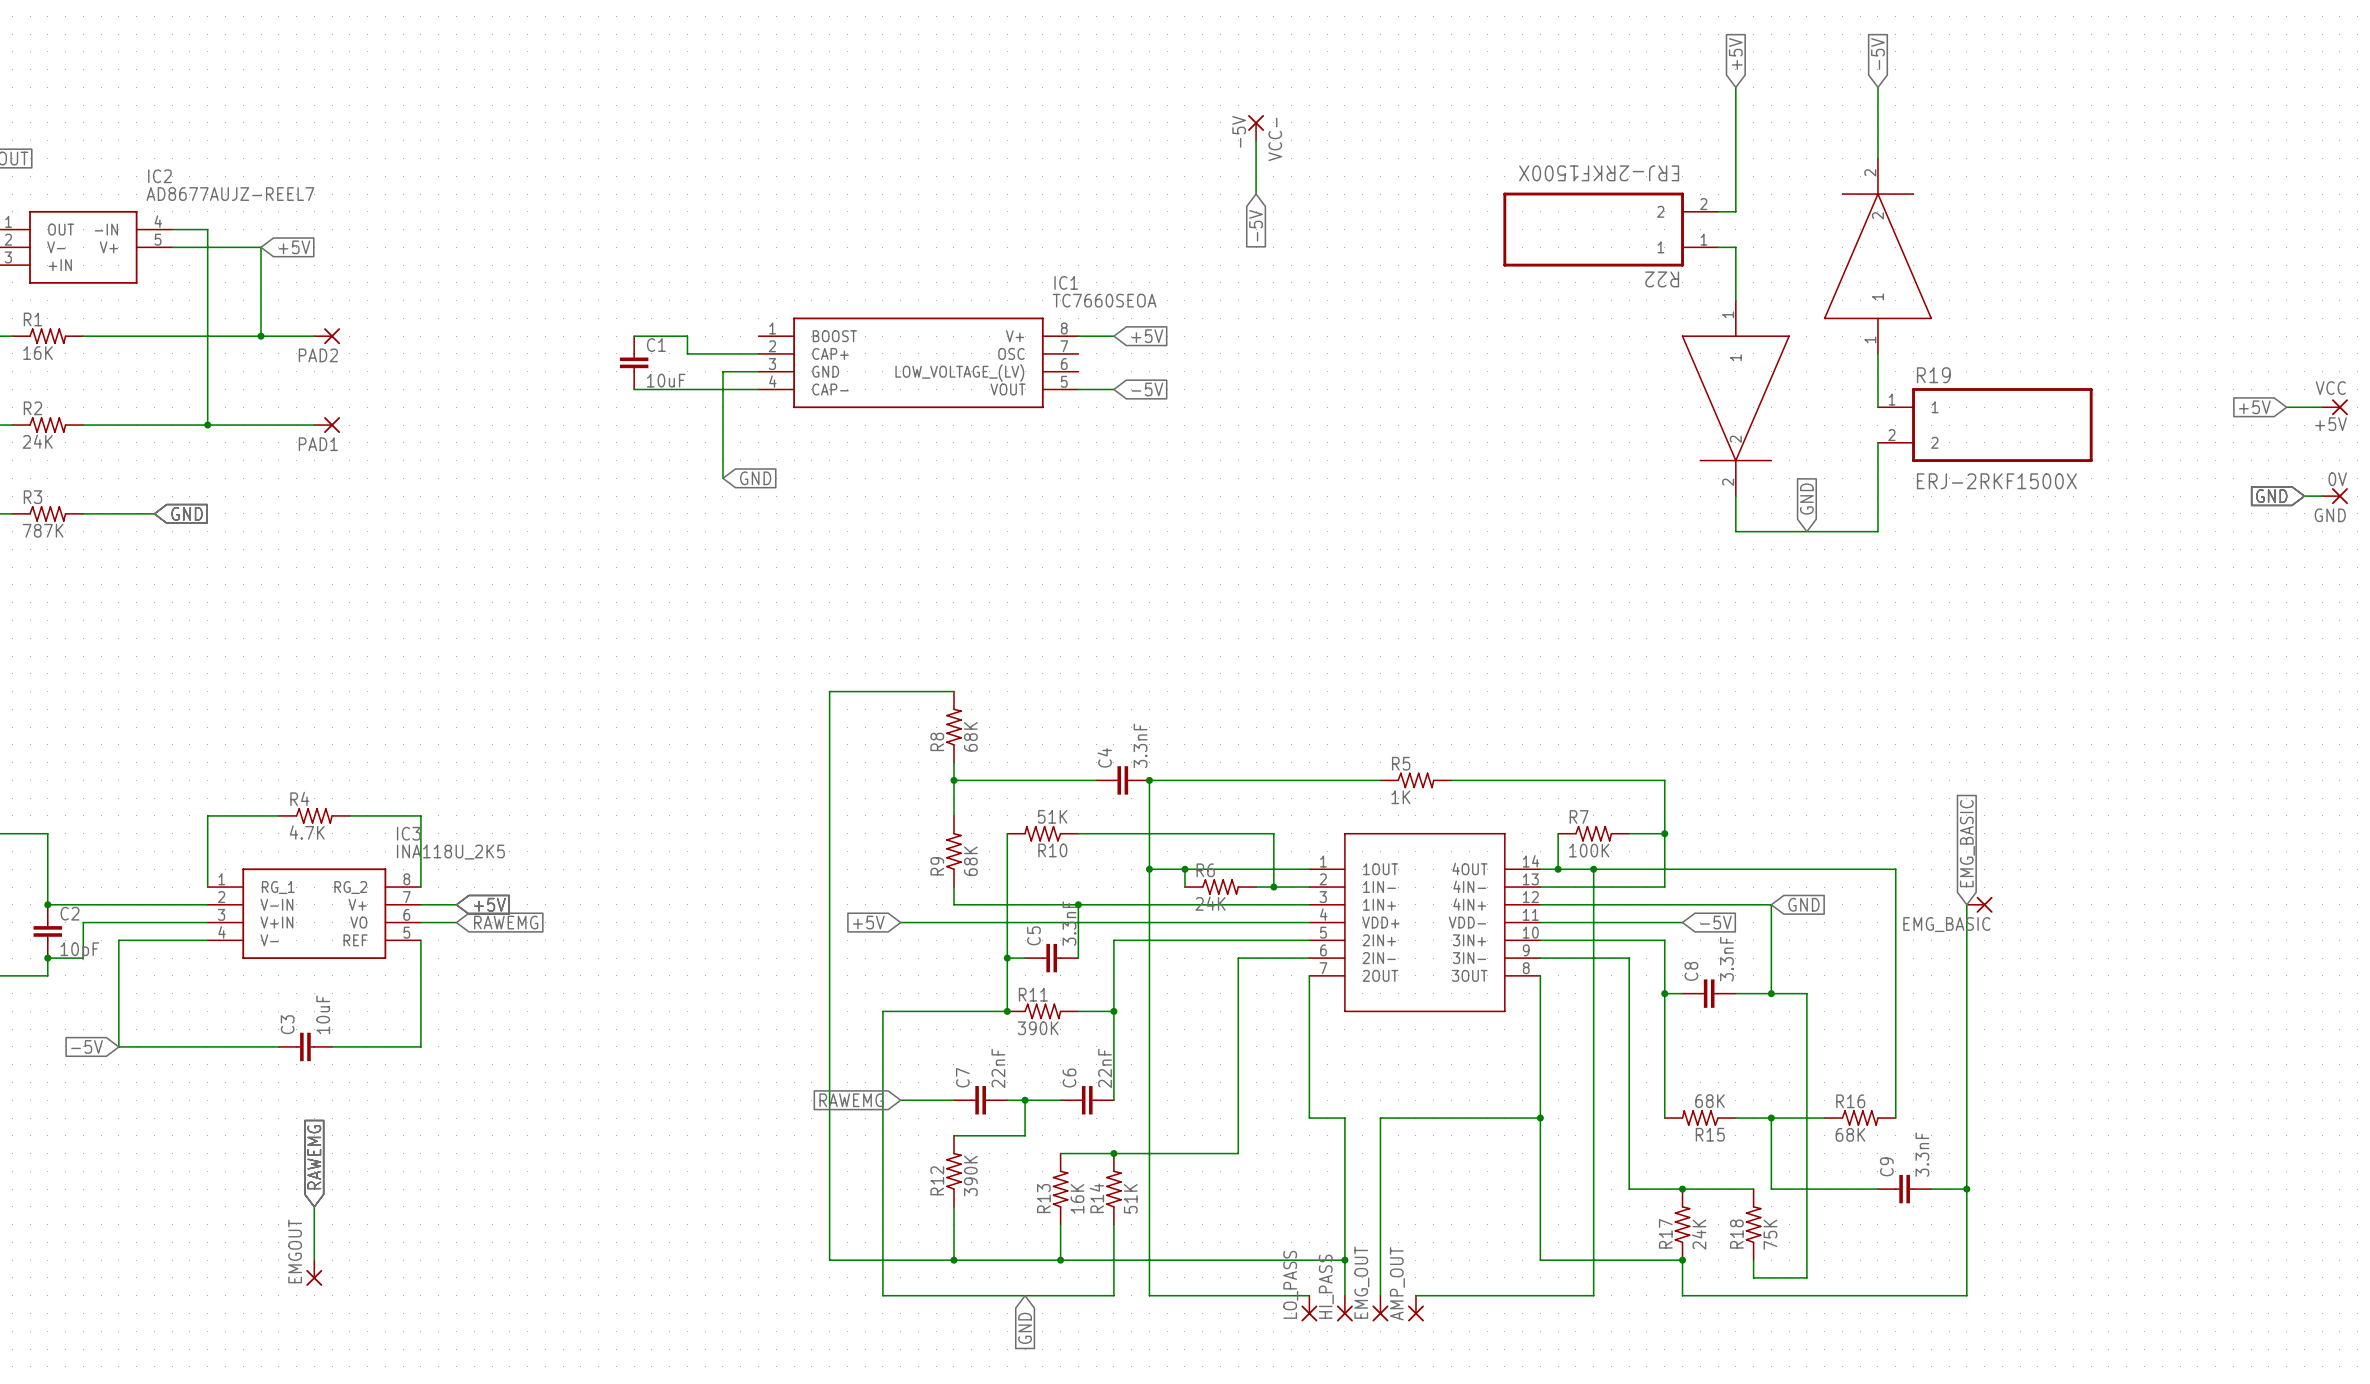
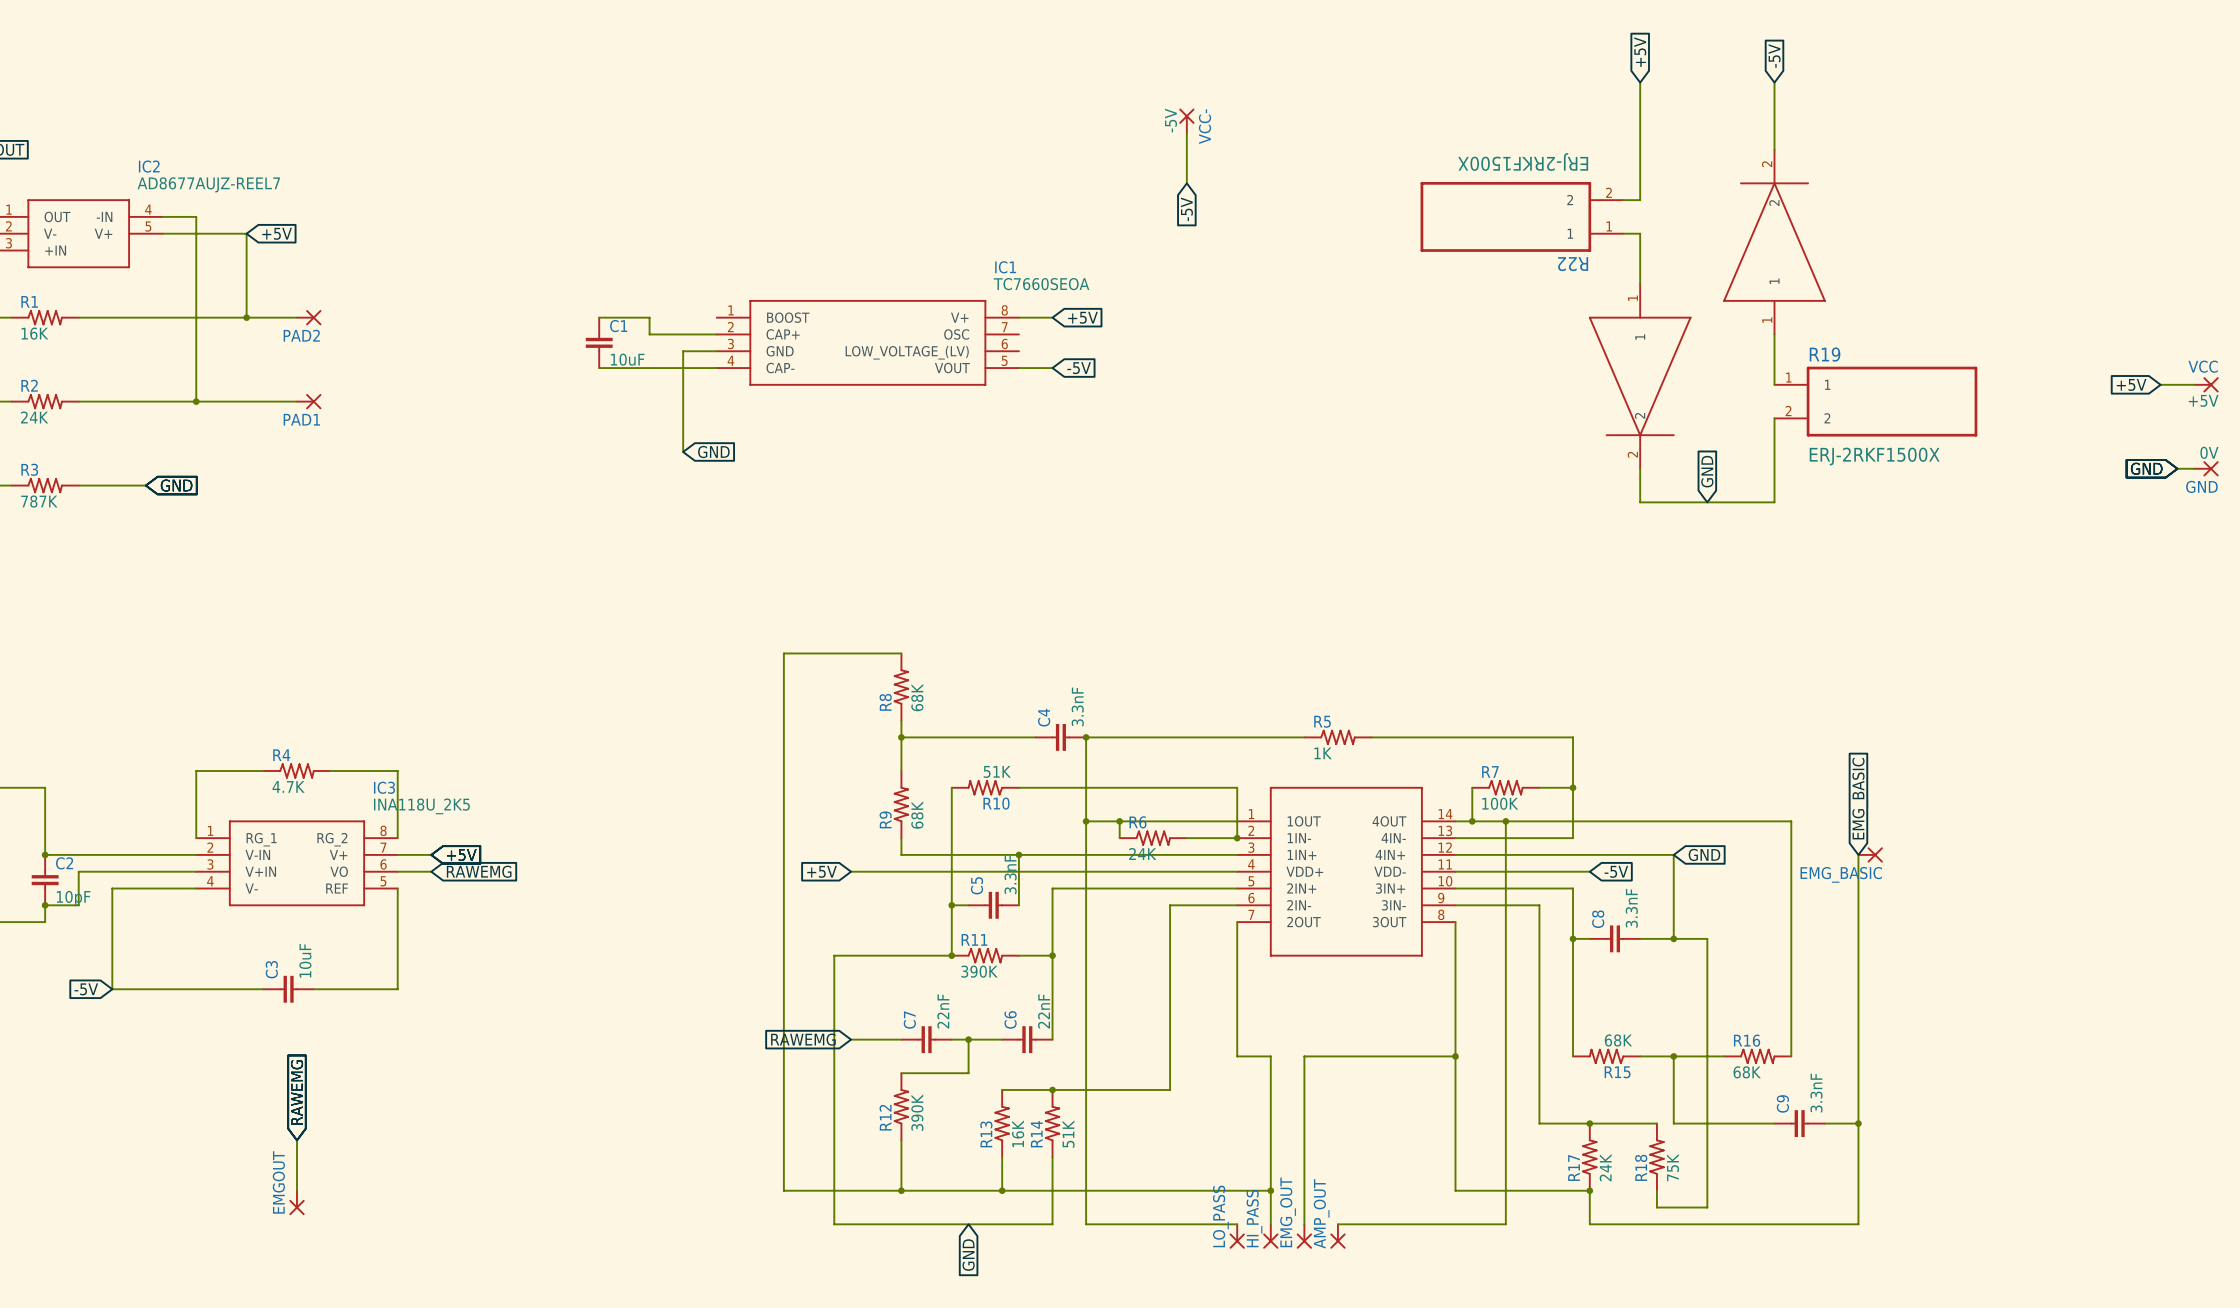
wire: (1273, 833) (1273, 887) -> (1203, 787) (1237, 787) (1237, 838)
junction position: (1273, 887) -> (1237, 838)

